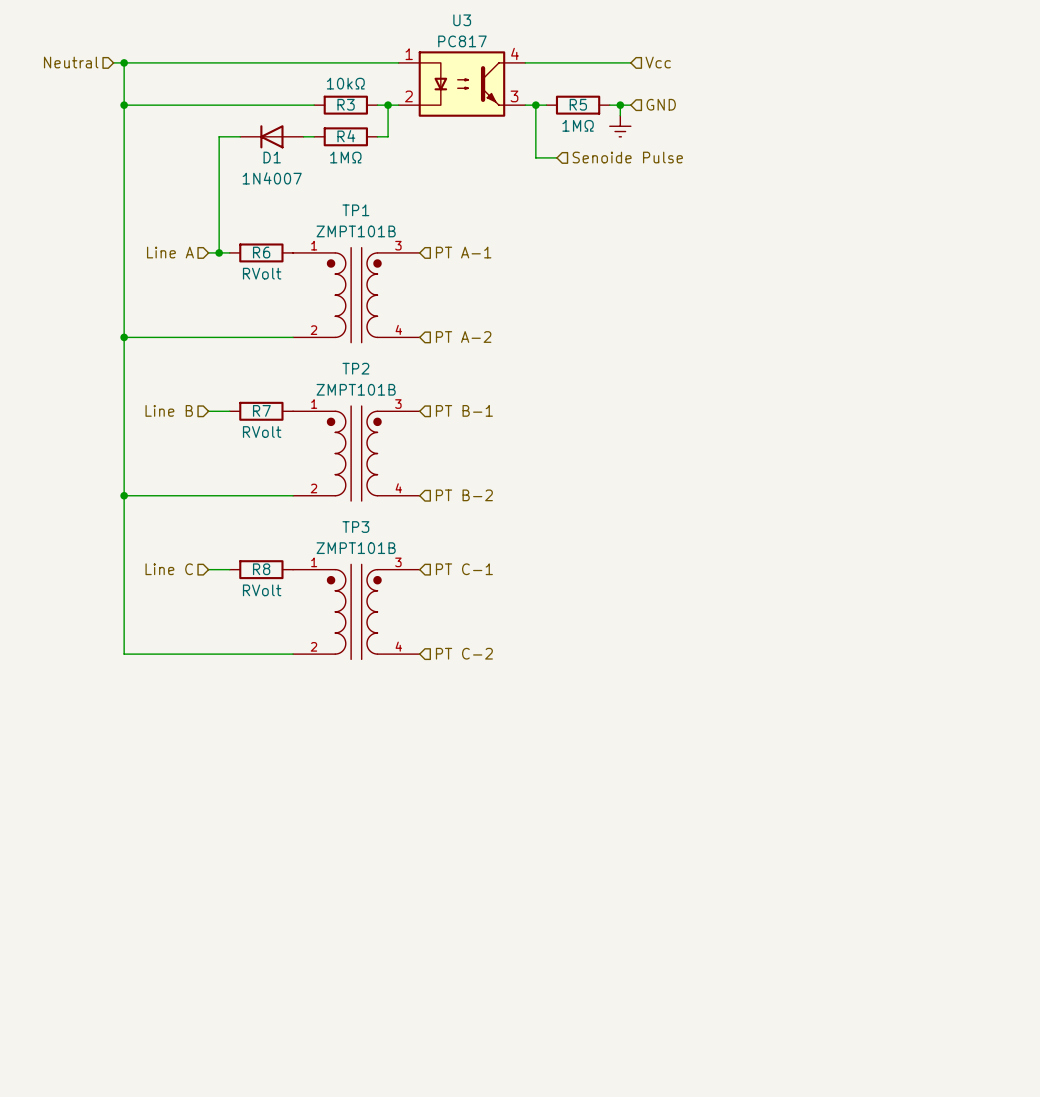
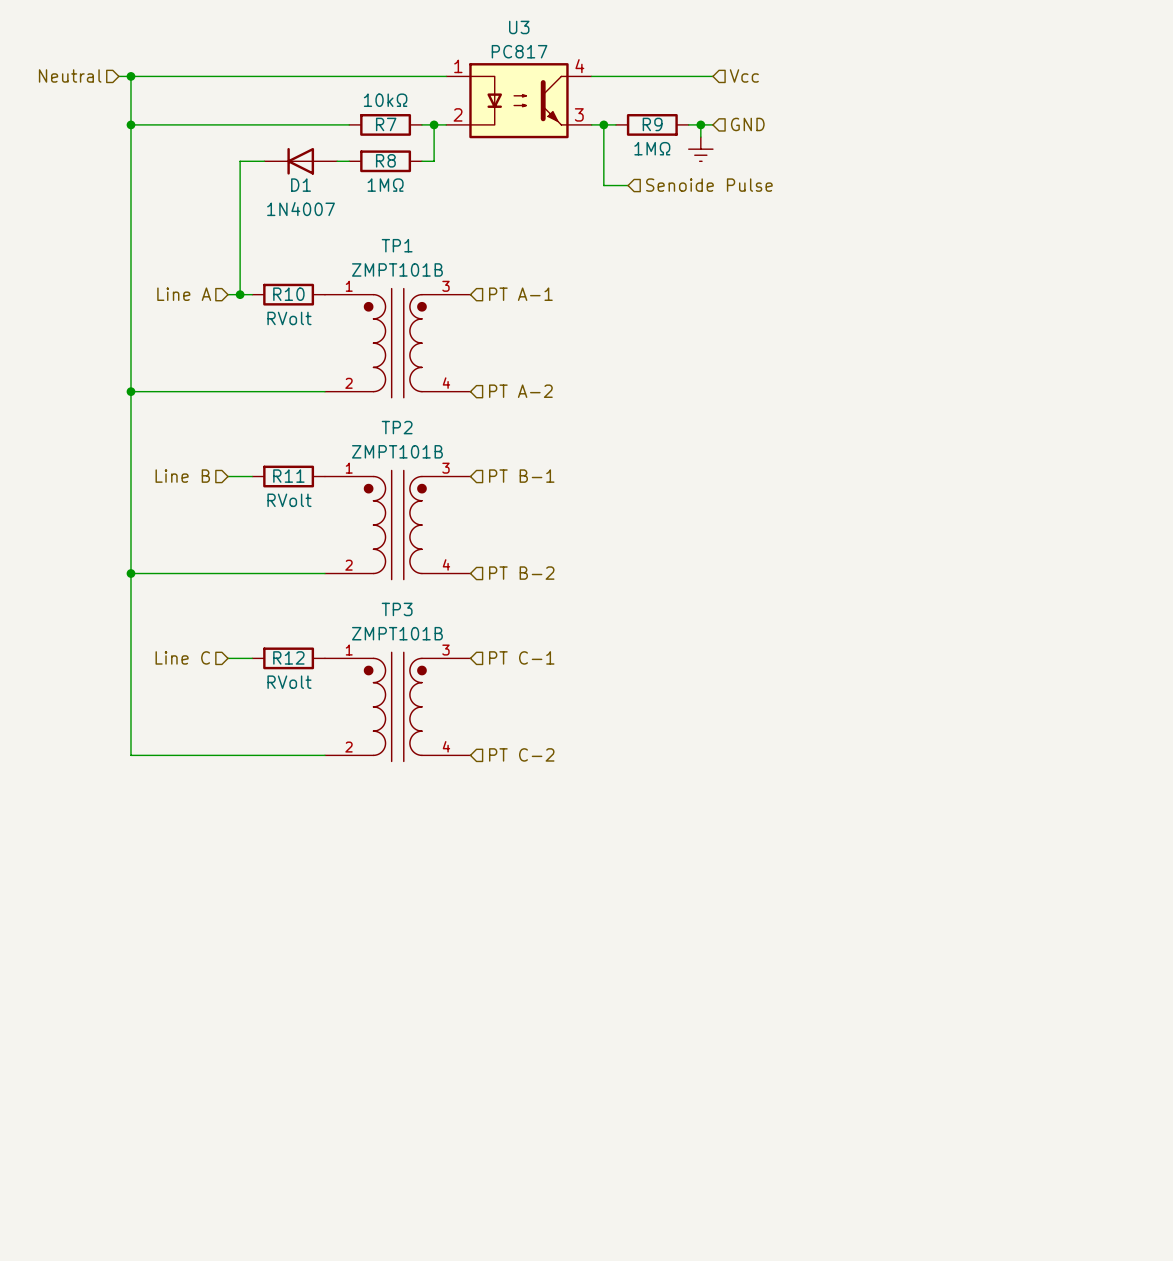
R3 name: R3 (346, 104) -> R7 (386, 124)
R5 name: R5 (578, 104) -> R9 (652, 124)
R4 name: R4 (346, 136) -> R8 (385, 160)
R6 name: R6 (261, 252) -> R10 (288, 294)
R7 name: R7 (261, 410) -> R11 (288, 476)
R8 name: R8 (261, 569) -> R12 (288, 657)

